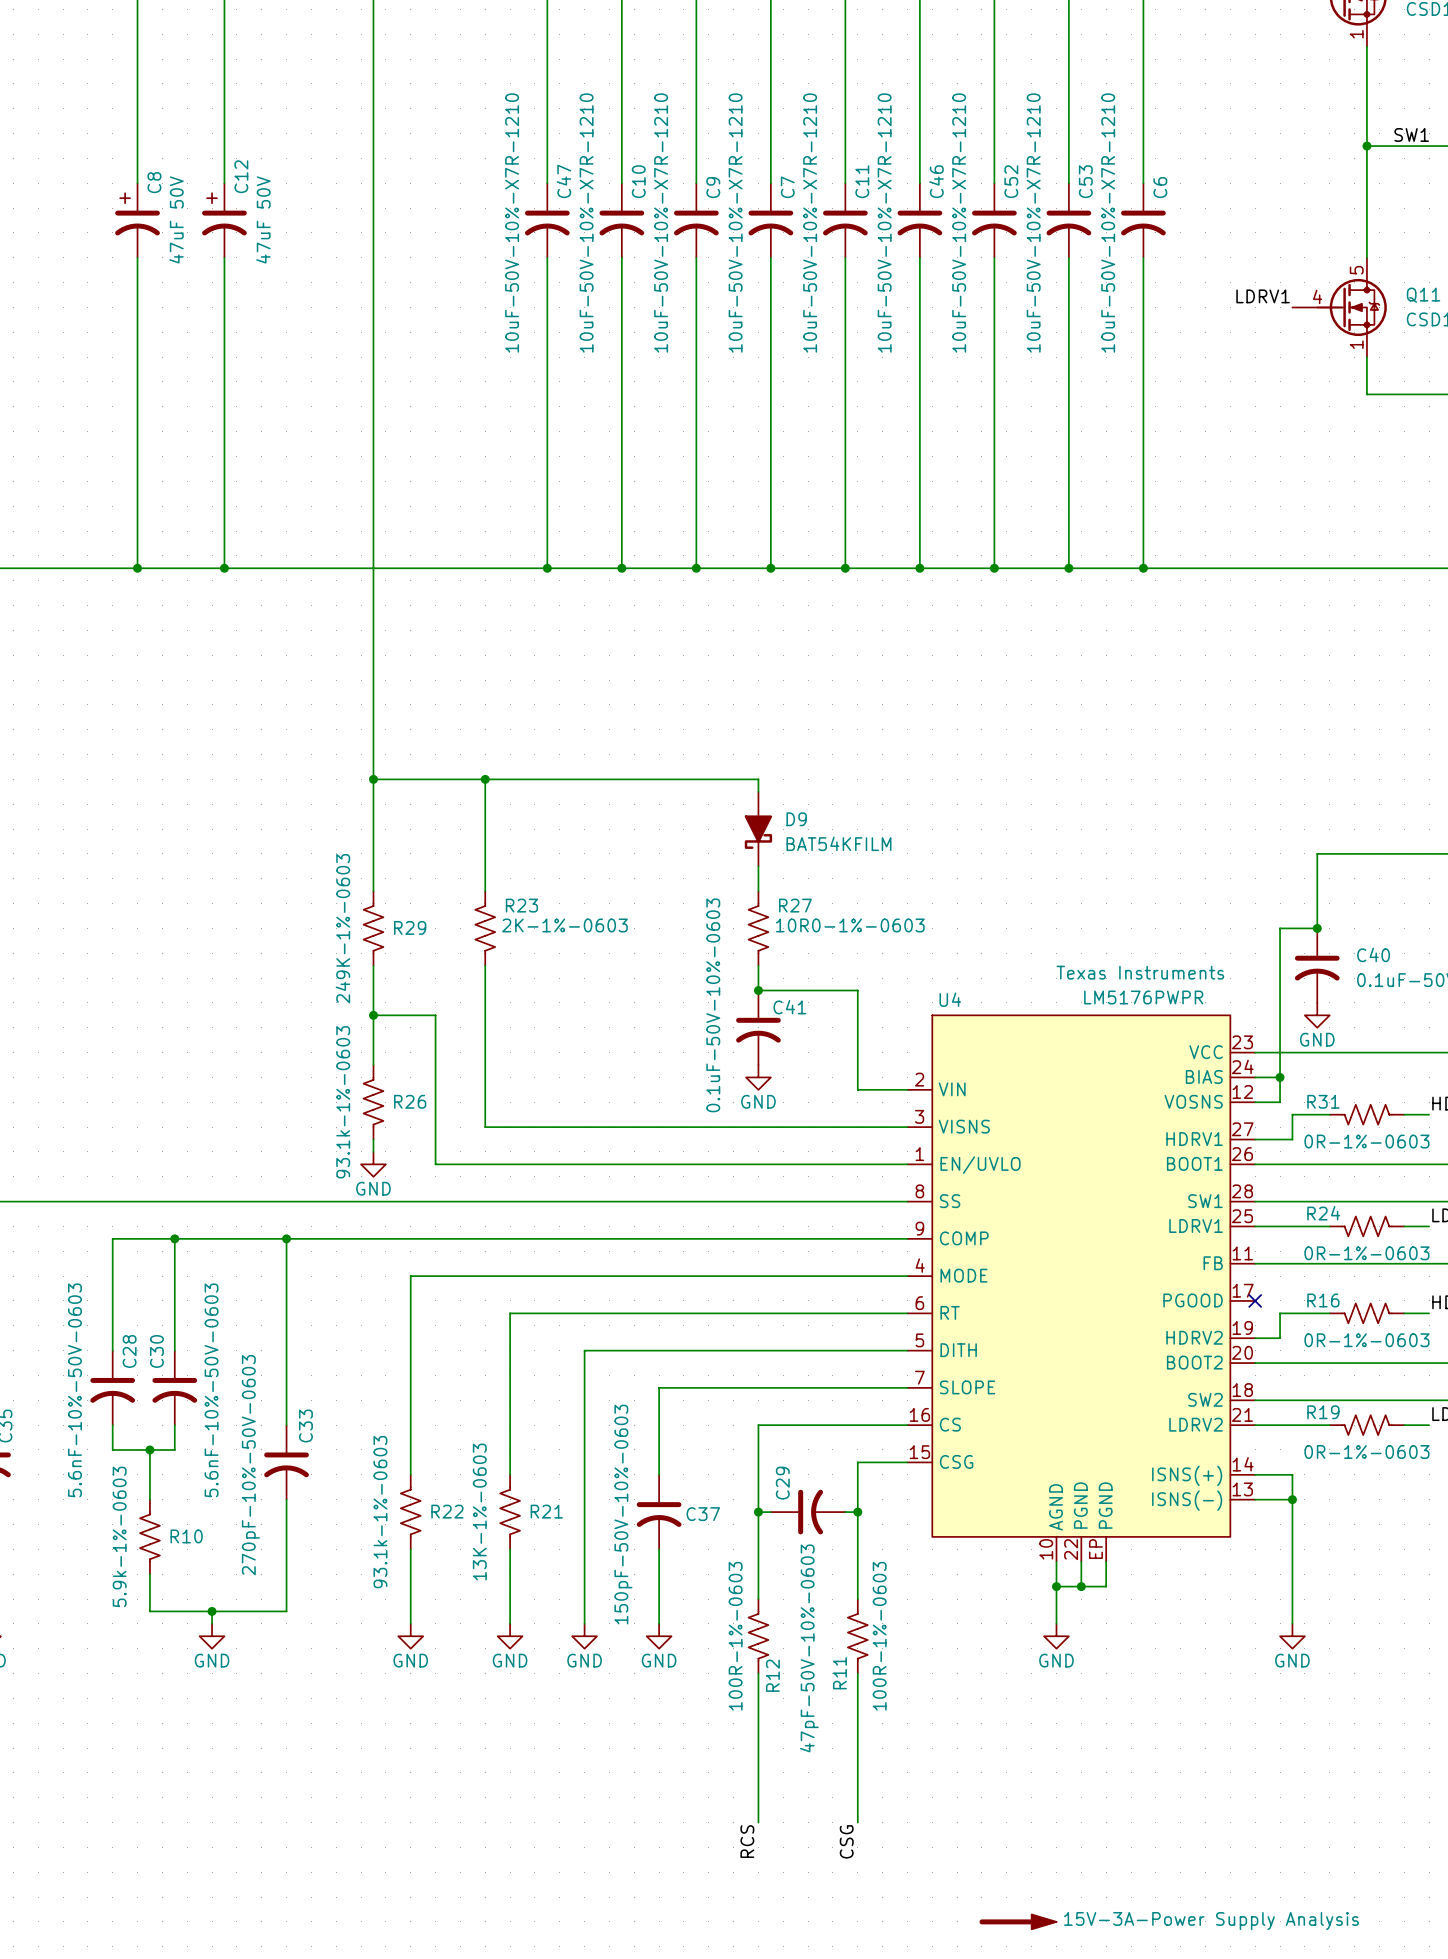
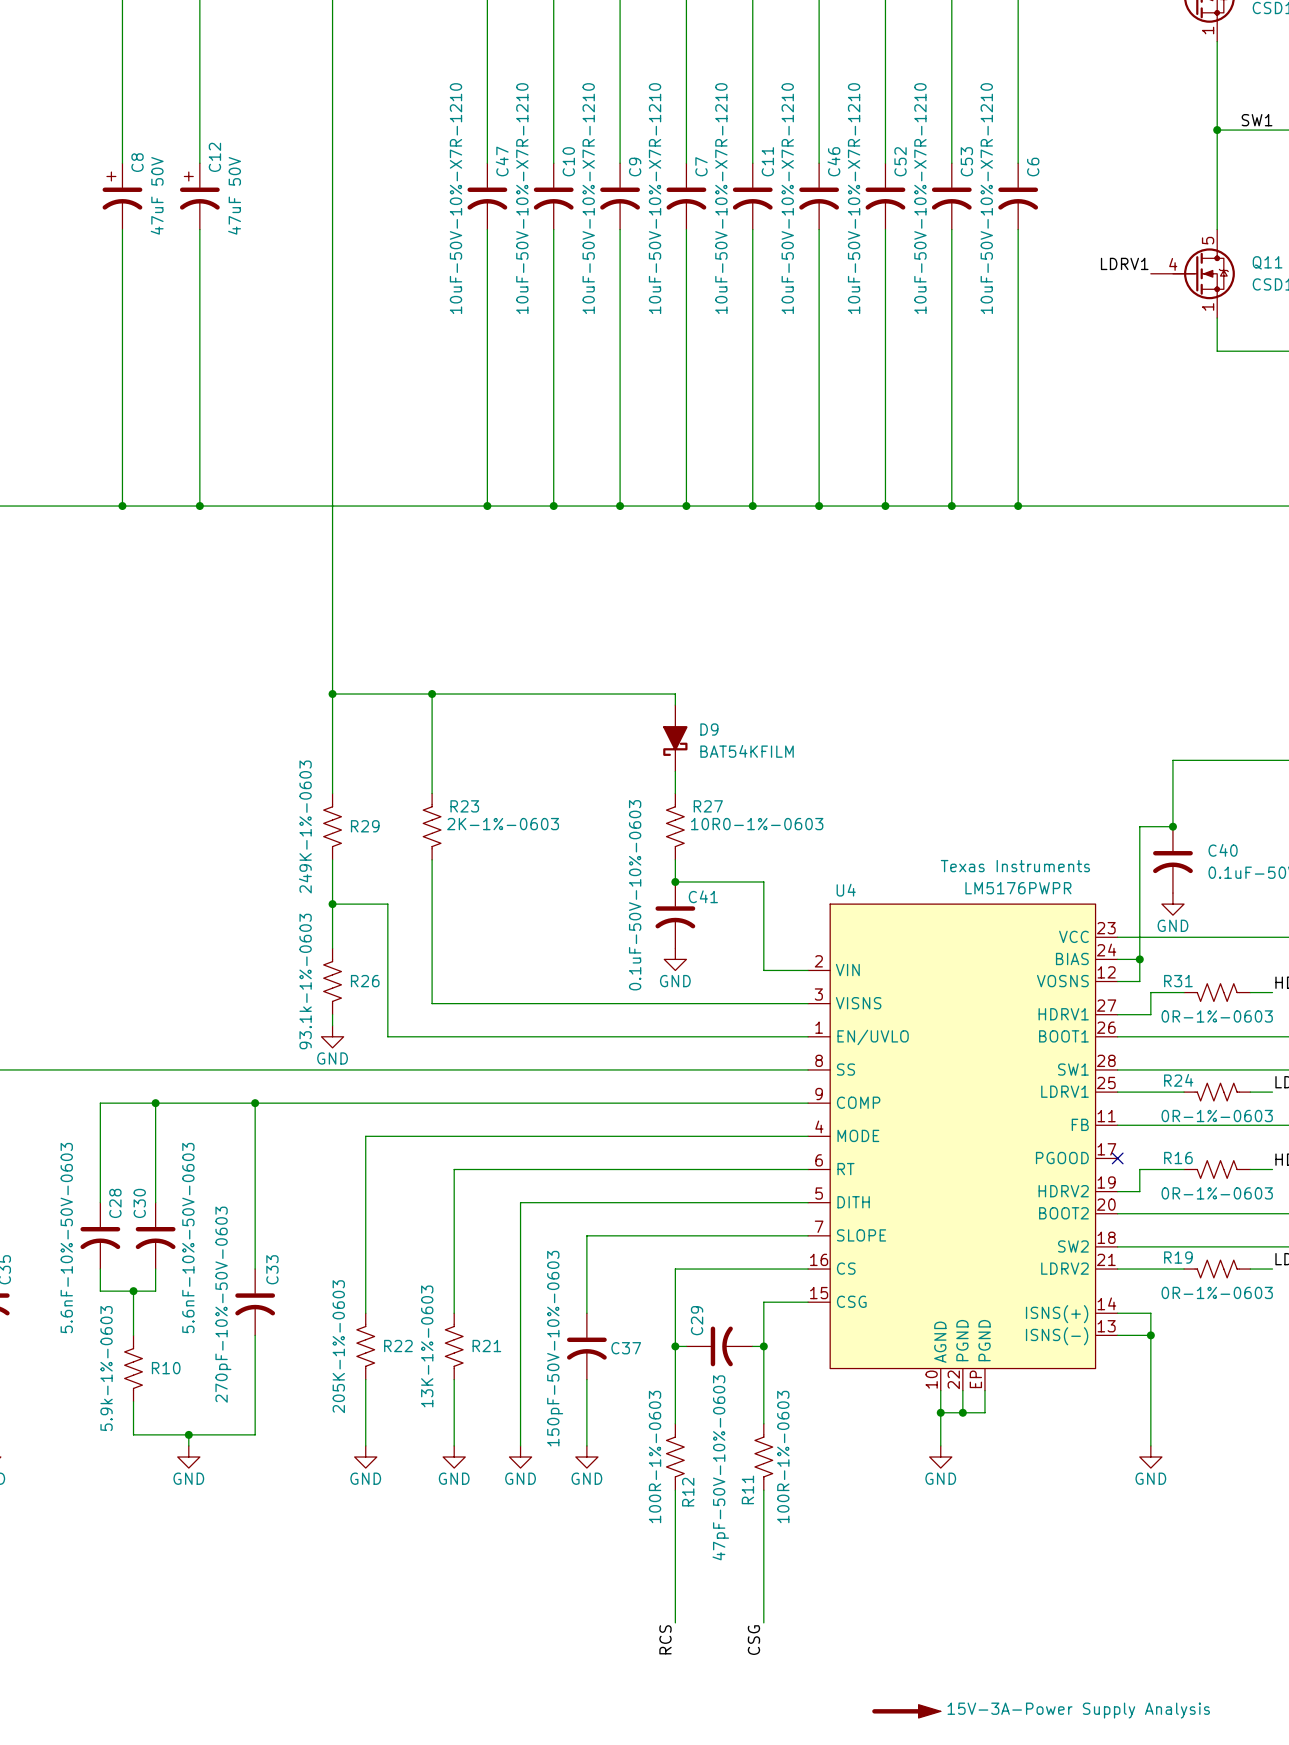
R22 value: 93.1k-1%-0603 (380, 1512) -> 205K-1%-0603 (338, 1346)

